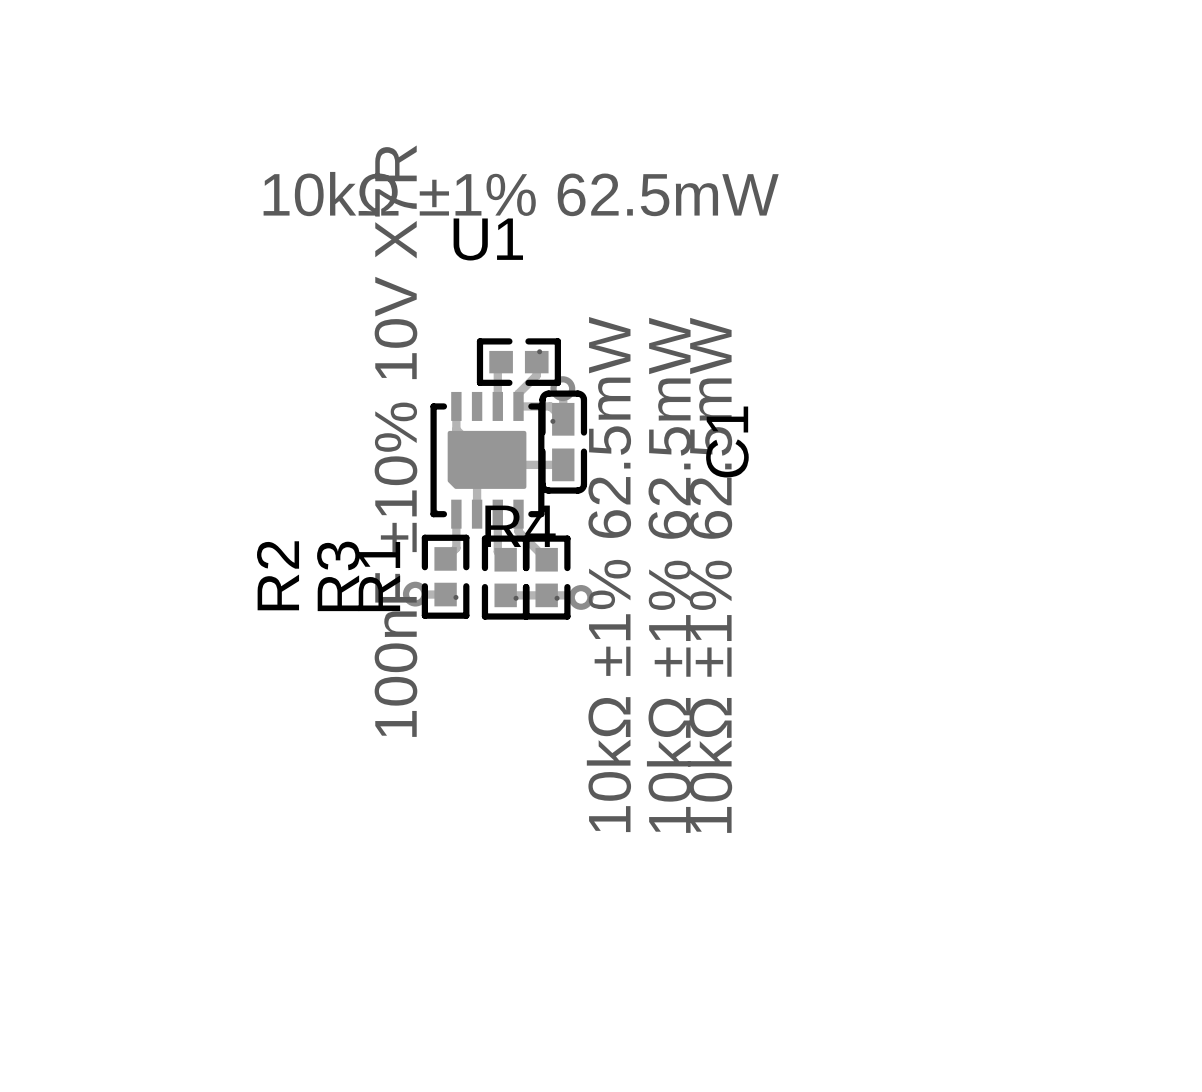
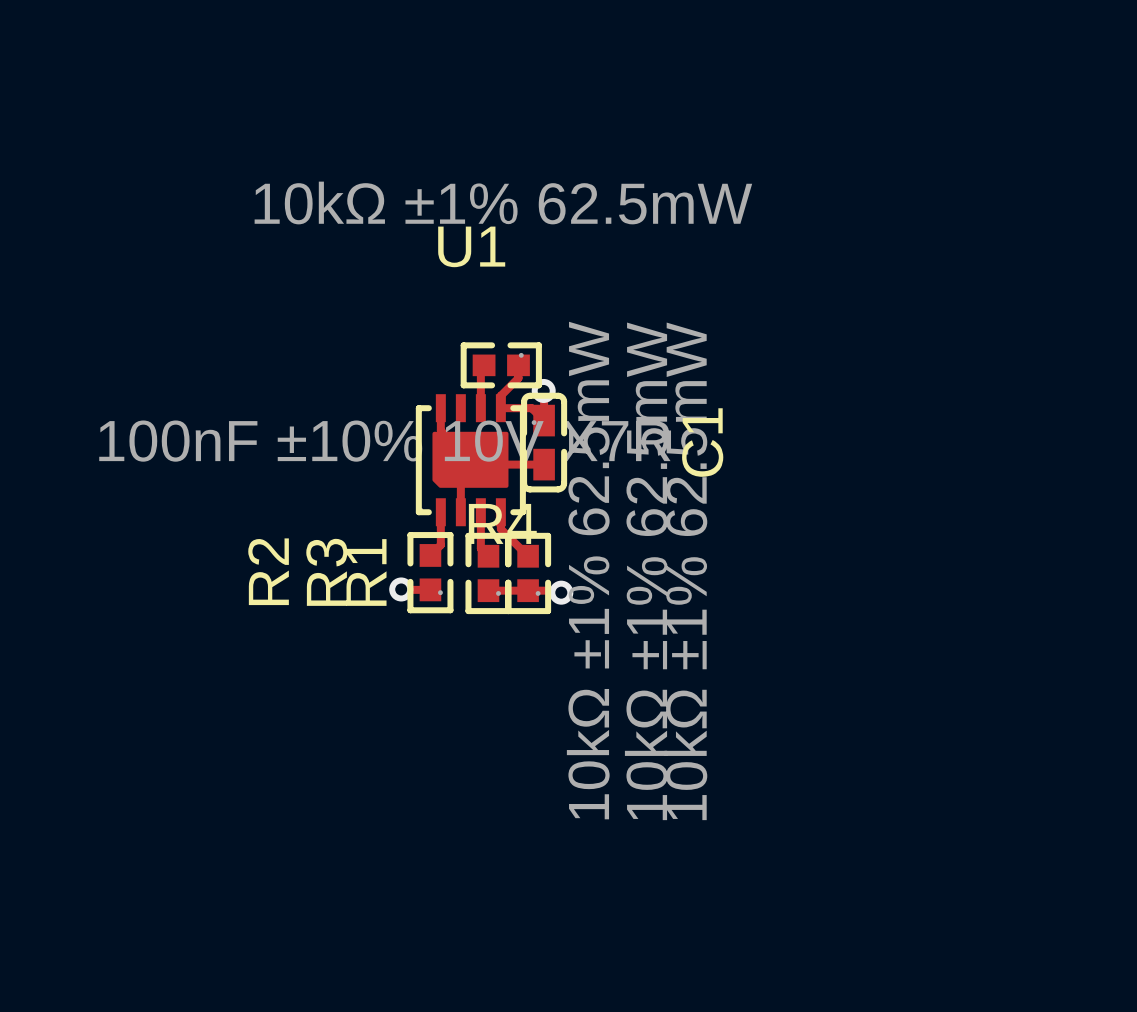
C1 value rotation: 0° (395, 441) -> 90° clockwise (384, 441)

